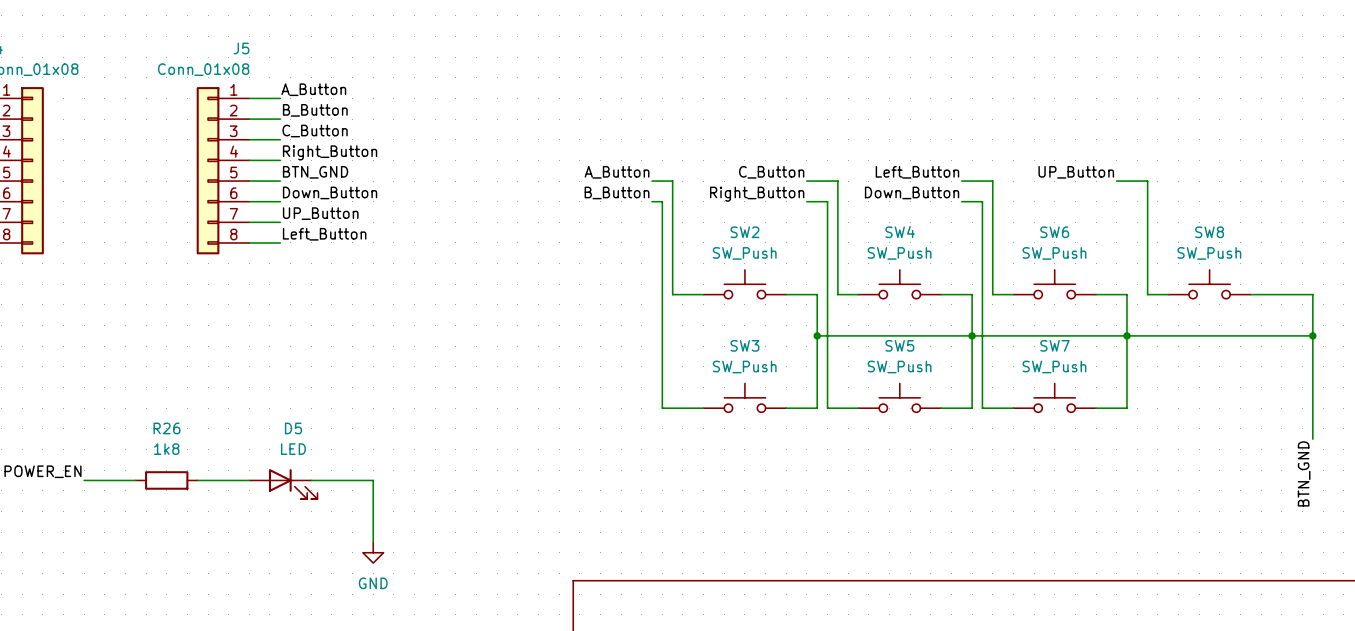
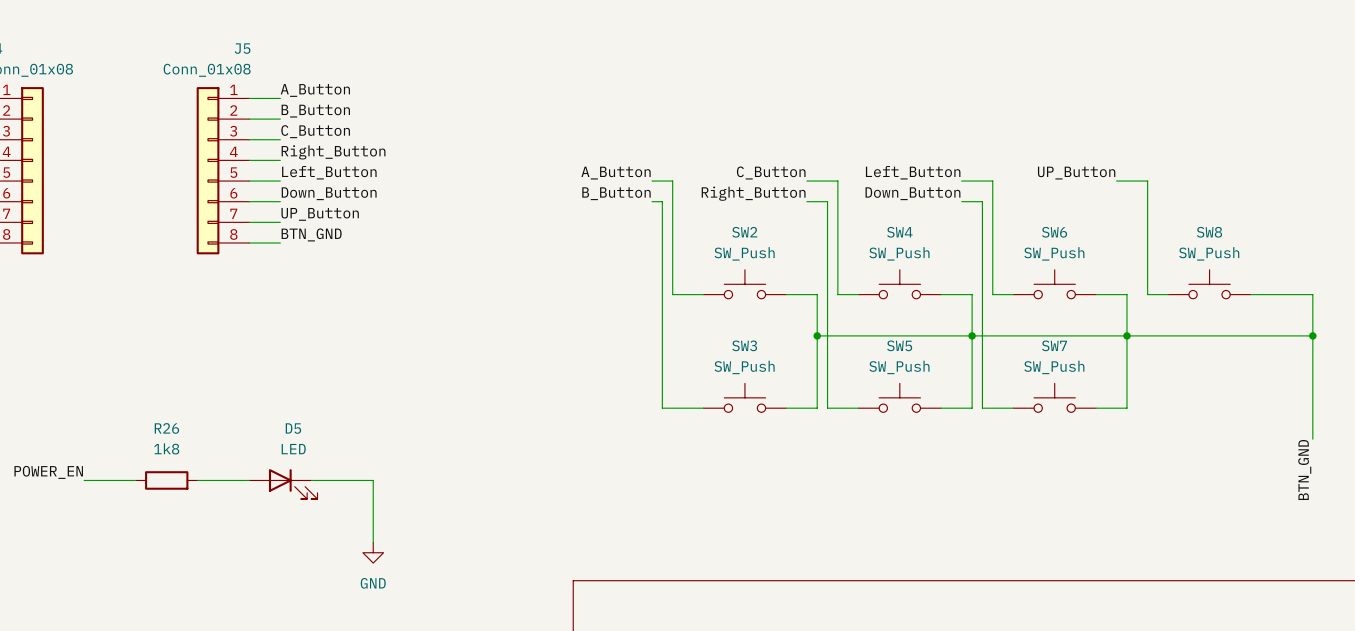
label: BTN_GND (315, 172) -> Left_Button (329, 172)
label: Left_Button (324, 234) -> BTN_GND (311, 234)

